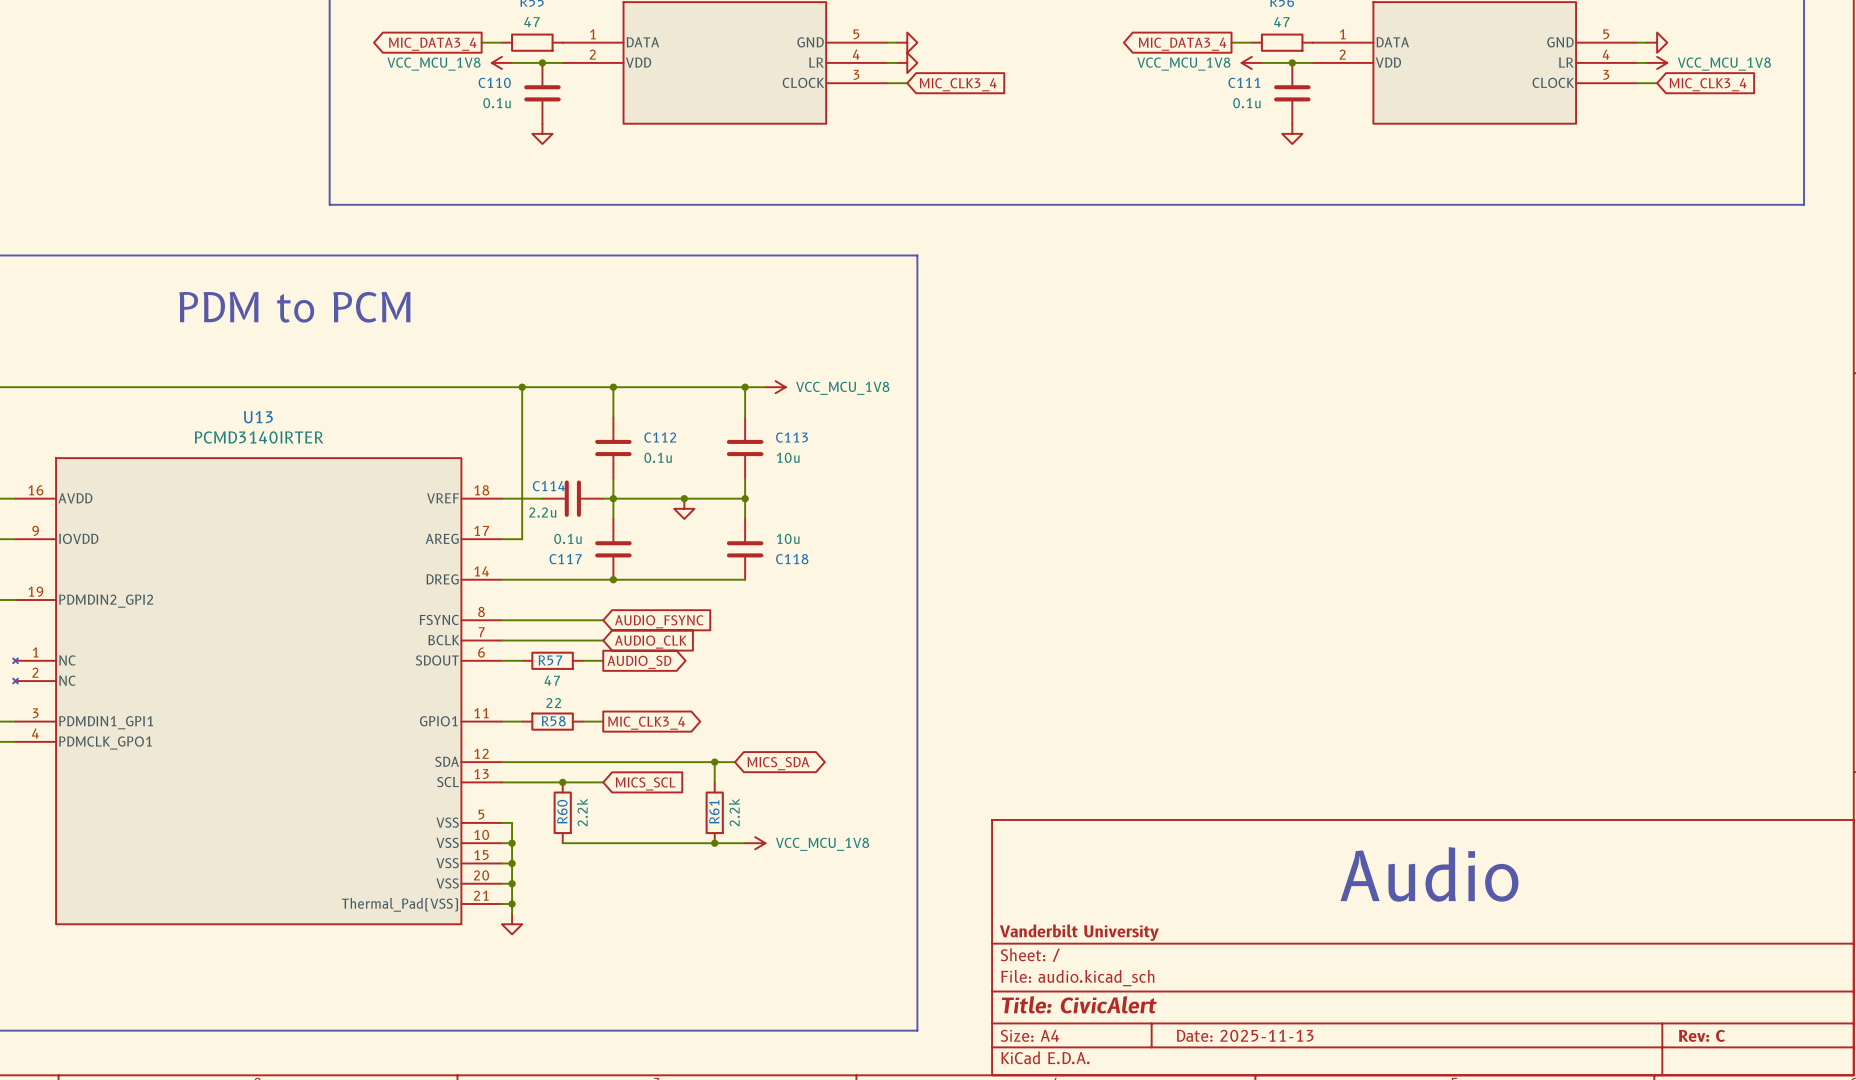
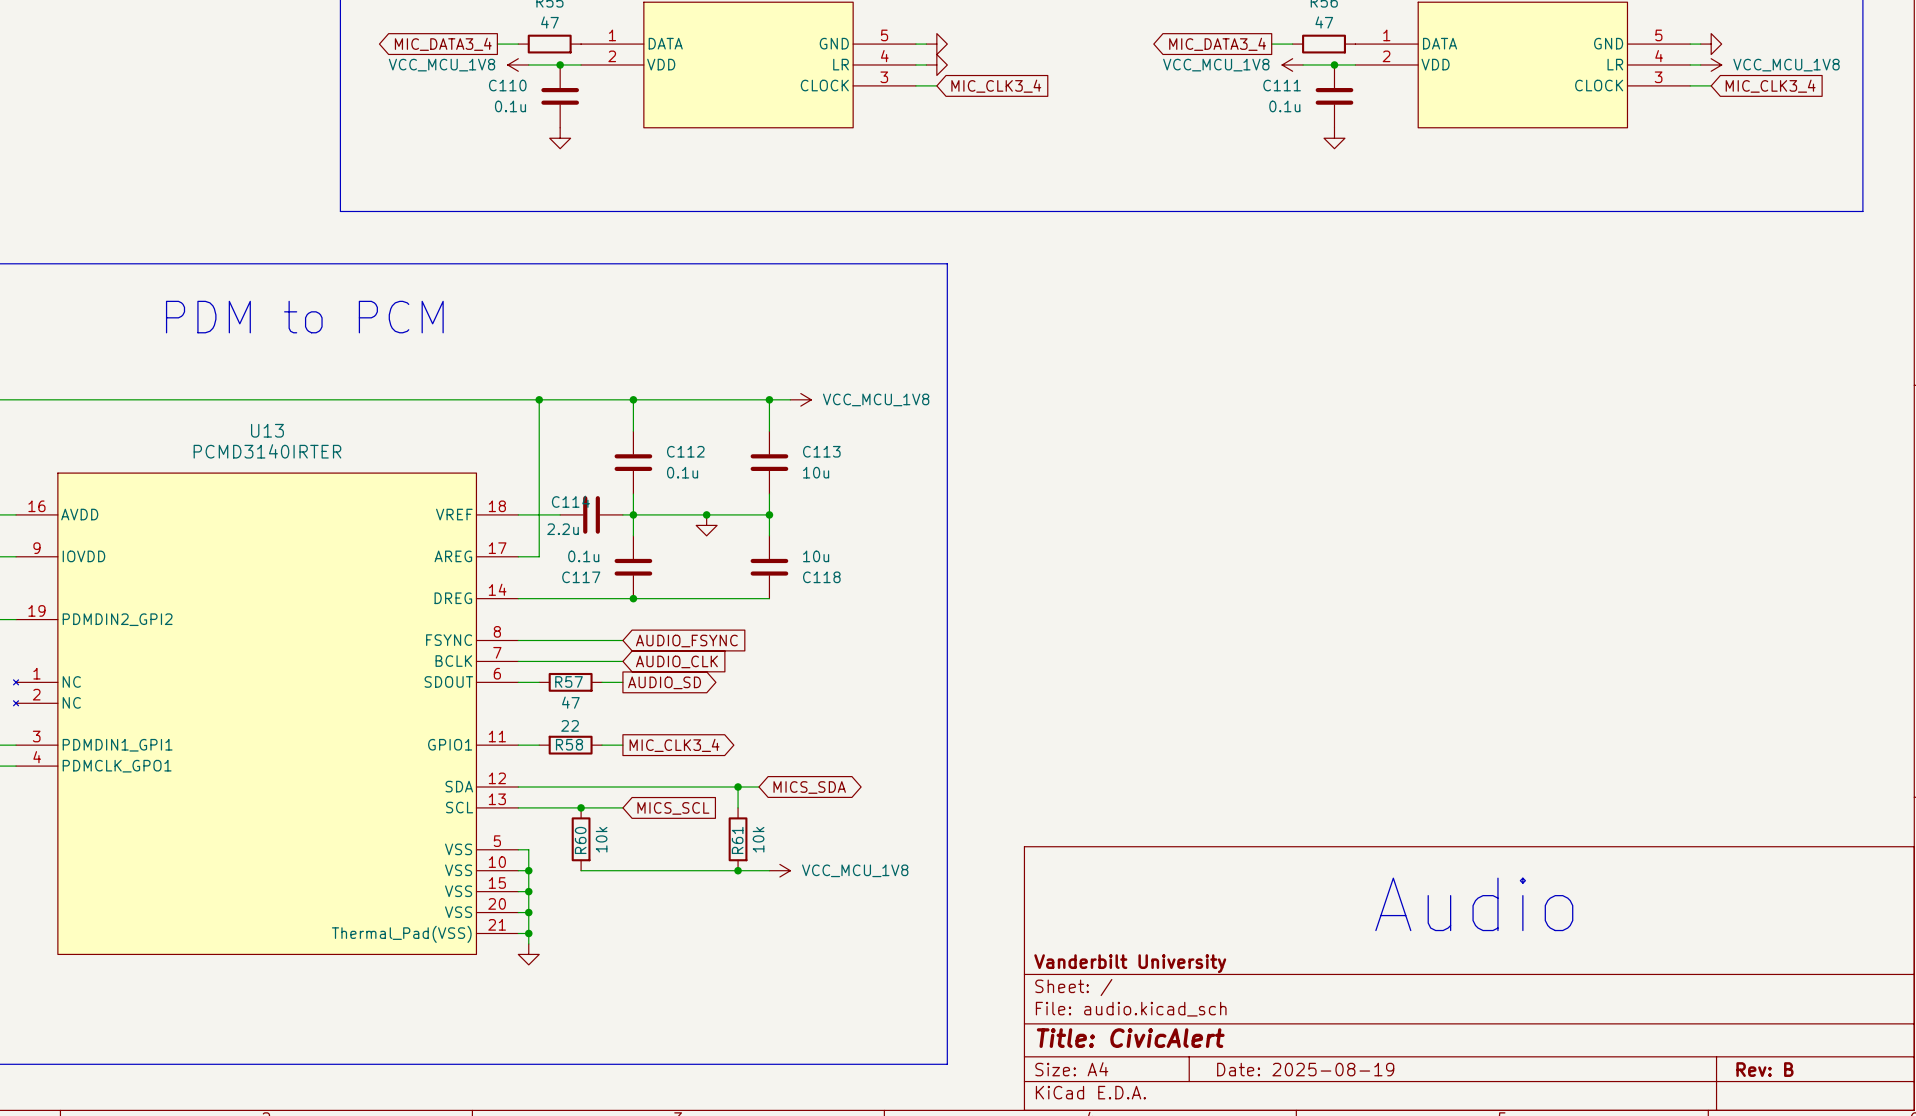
R60 value: 2.2k (582, 812) -> 10k (601, 839)
R61 value: 2.2k (734, 812) -> 10k (758, 839)
title block: Date: 2025-11-13 (1245, 1035) -> Date: 2025-08-19 (1305, 1069)
title block: Rev: C (1701, 1035) -> Rev: B (1764, 1069)

